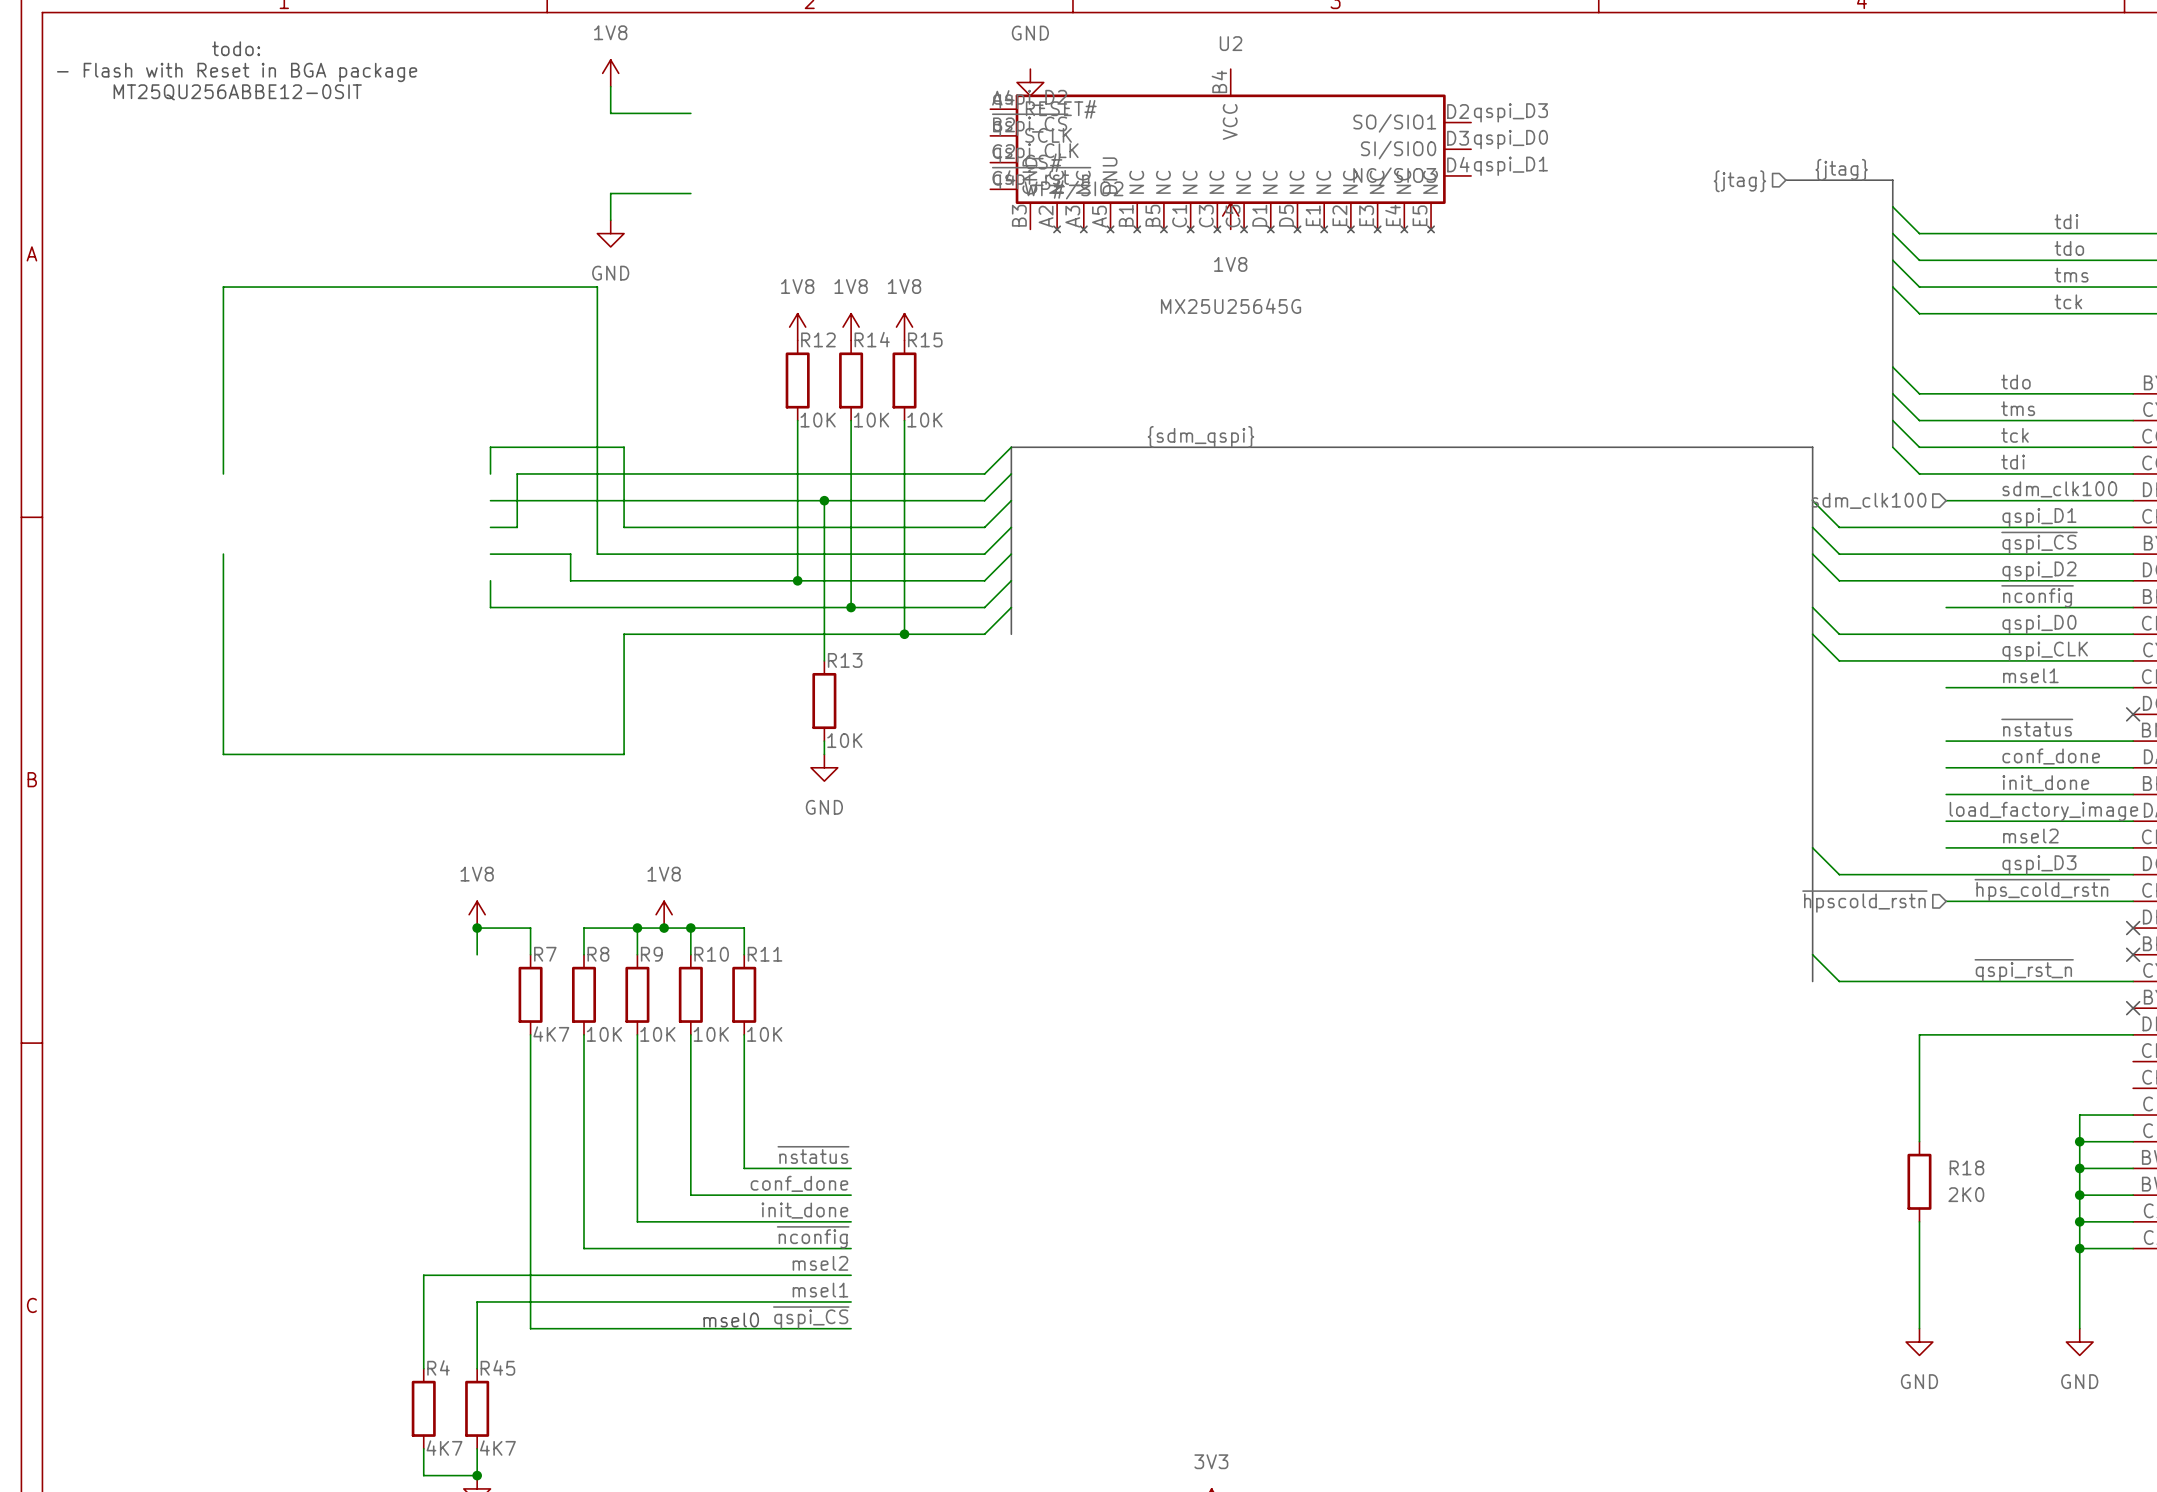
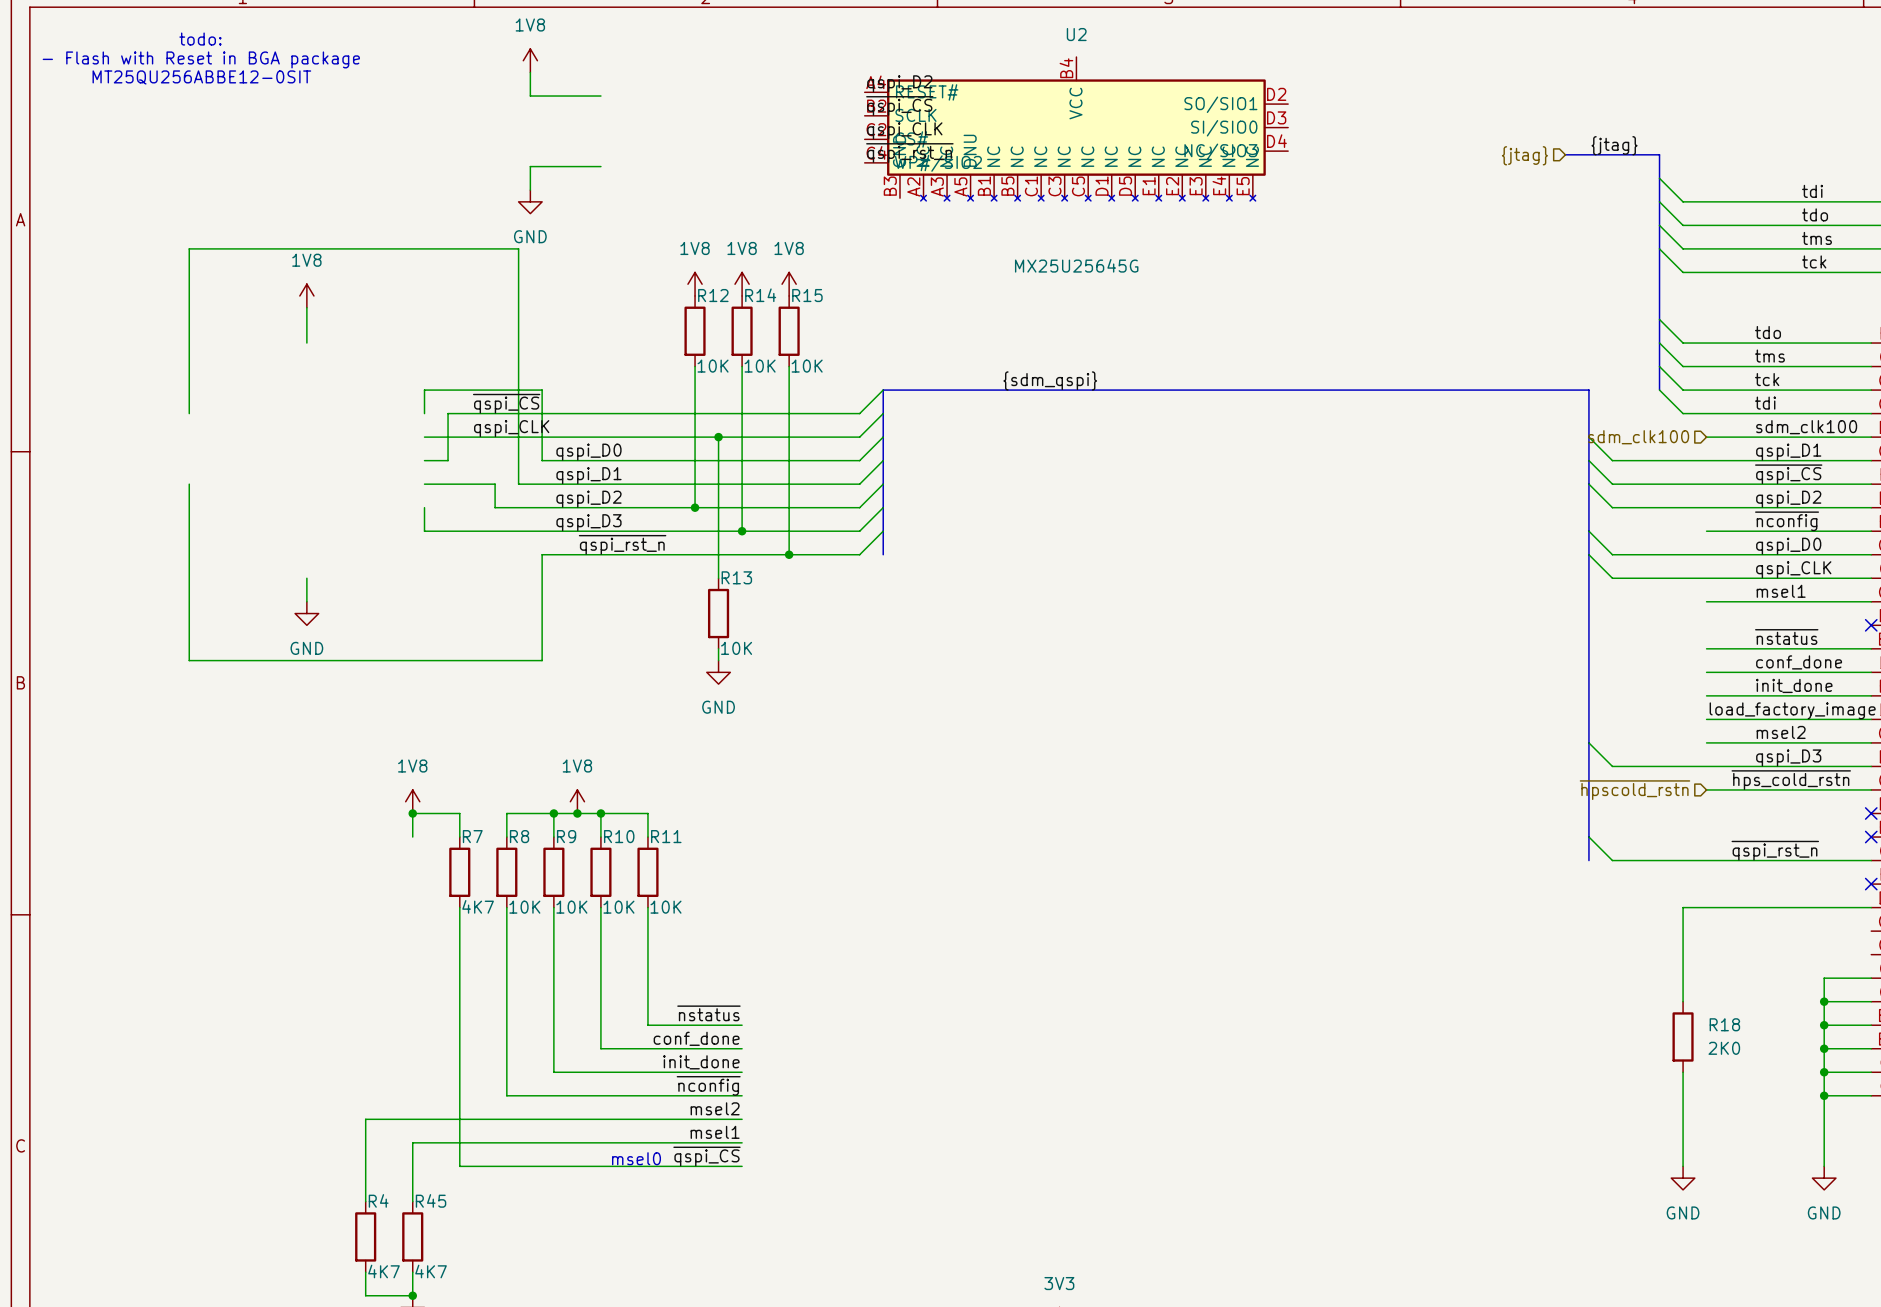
power symbol: GND (1030, 82) -> none
label: qspi_D3 (1510, 112) -> none
label: qspi_D0 (1510, 139) -> none
label: qspi_D1 (1510, 166) -> none
power symbol: 1V8 (1230, 216) -> none
power symbol: none -> 1V8 (306, 295)
wire: none -> (306, 307) (306, 343)
label: none -> ~{qspi_CS} (506, 403)
label: none -> qspi_CLK (511, 428)
label: none -> qspi_D0 (588, 452)
label: none -> qspi_D1 (588, 475)
label: none -> qspi_D2 (588, 499)
label: none -> qspi_D3 (588, 522)
label: none -> ~{qspi_rst_n} (622, 544)
wire: none -> (306, 578) (306, 601)
power symbol: none -> GND (306, 613)

